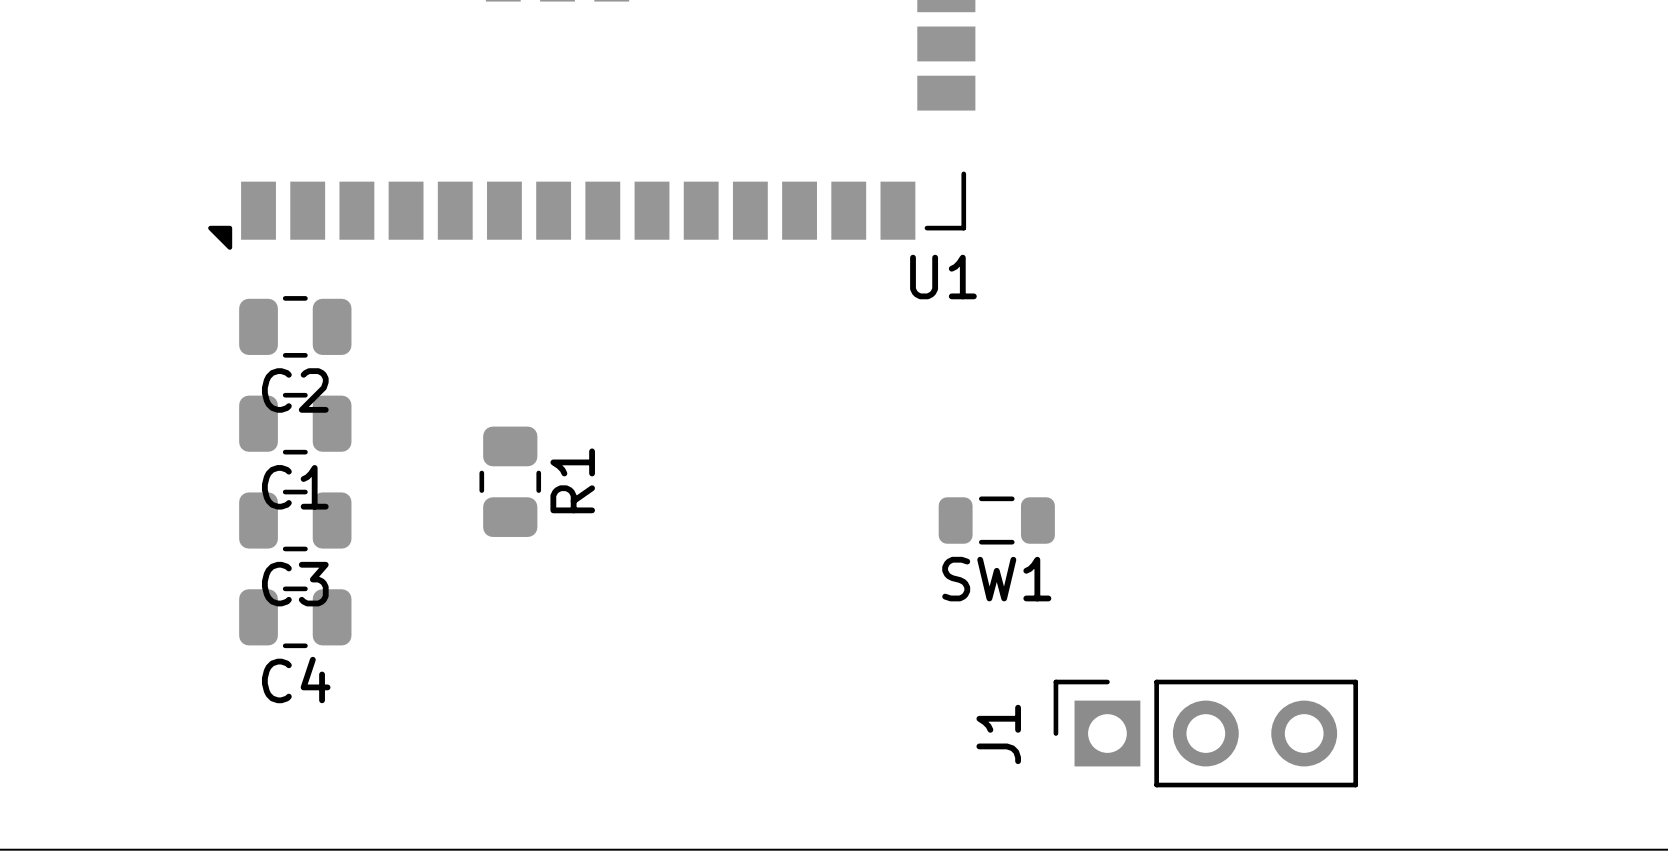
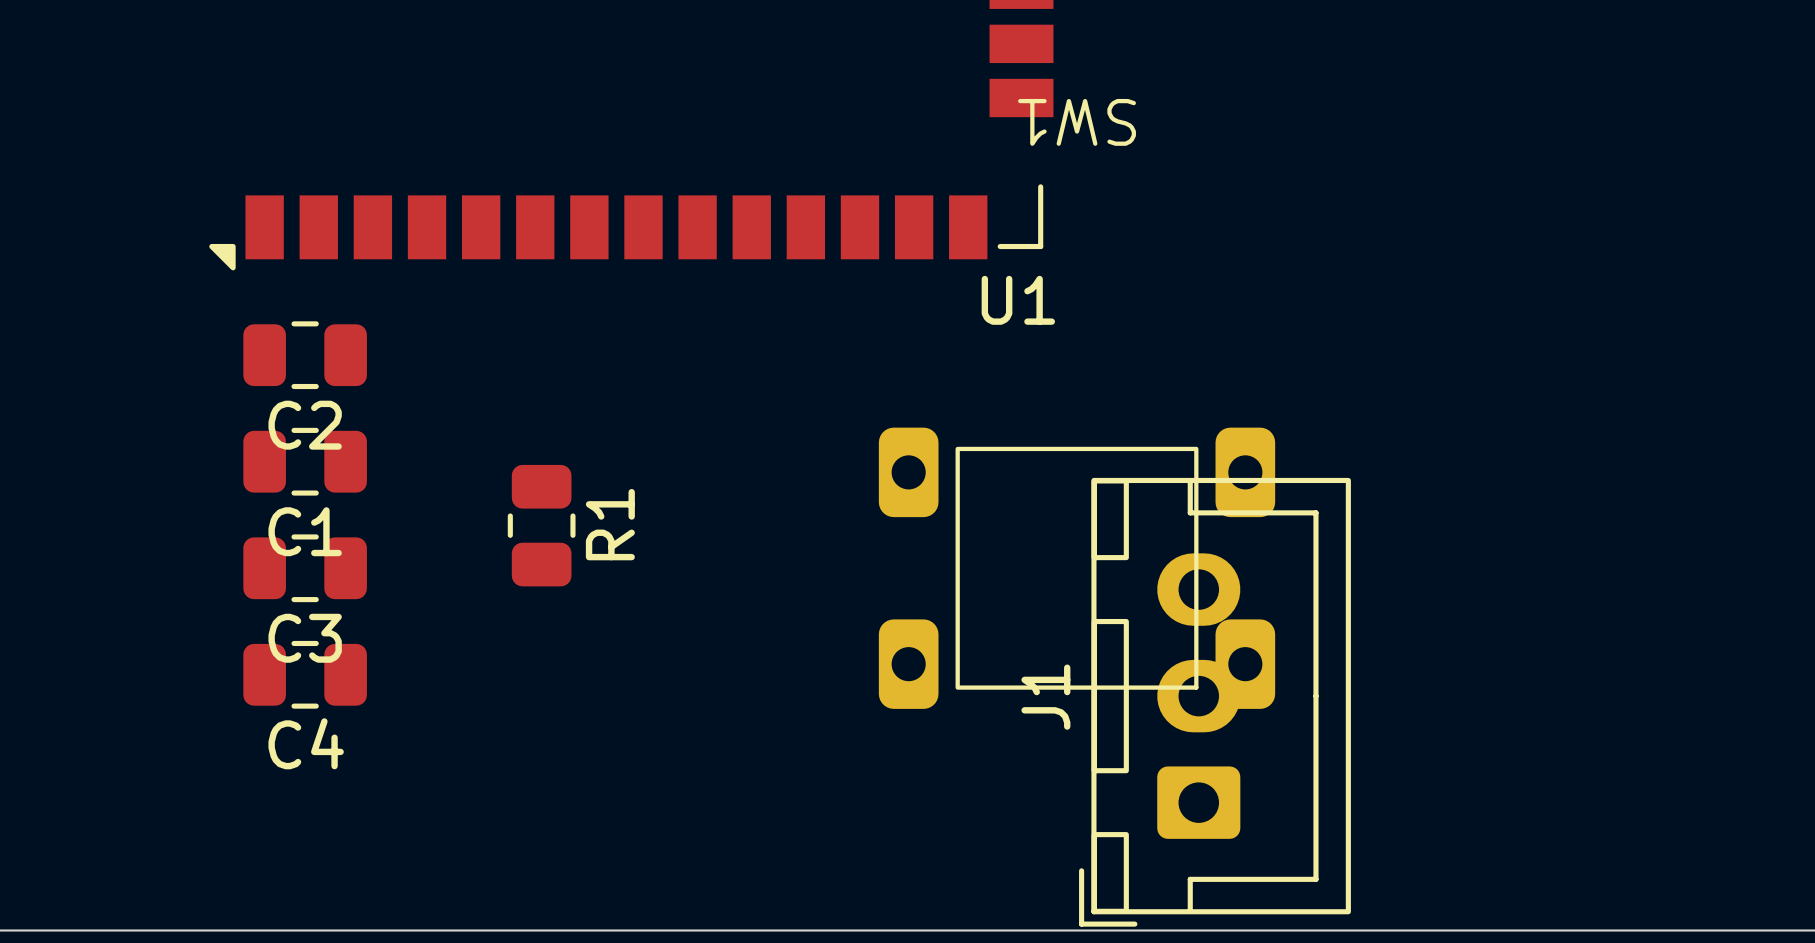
SW1 footprint: [938, 496, 1055, 545] -> [878, 427, 1276, 709]
SW1 name position: SW1 (996, 579) -> SW1 (1077, 122)
J1 footprint: [1053, 679, 1359, 788] -> [1079, 477, 1351, 927]

